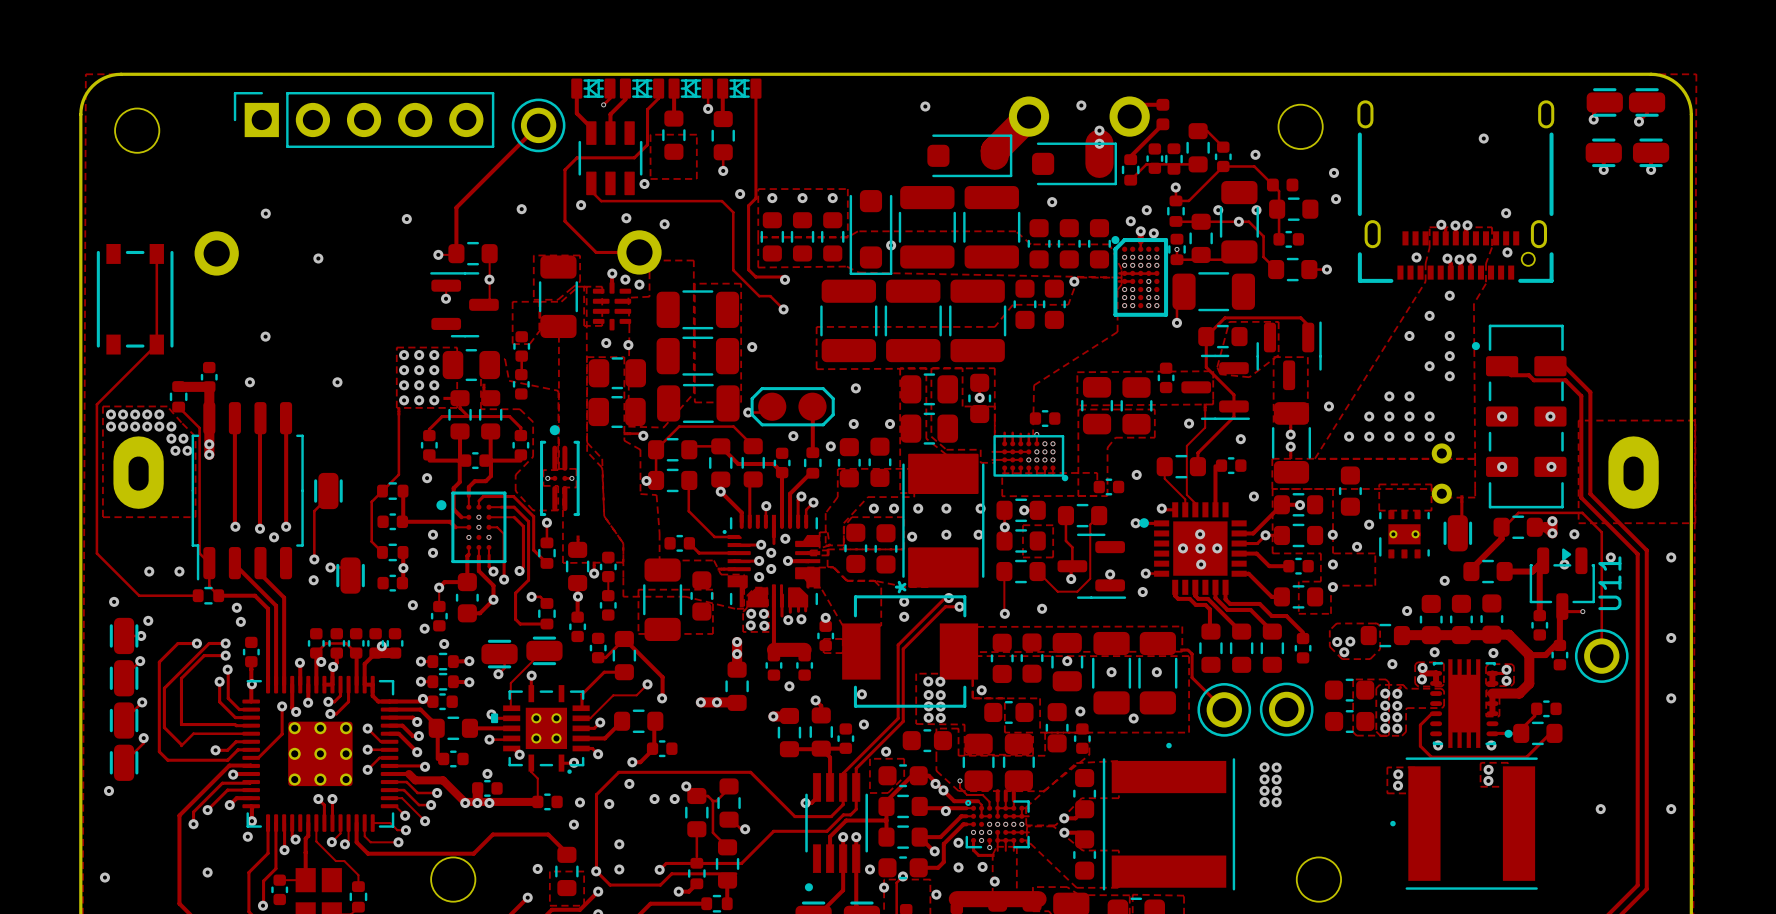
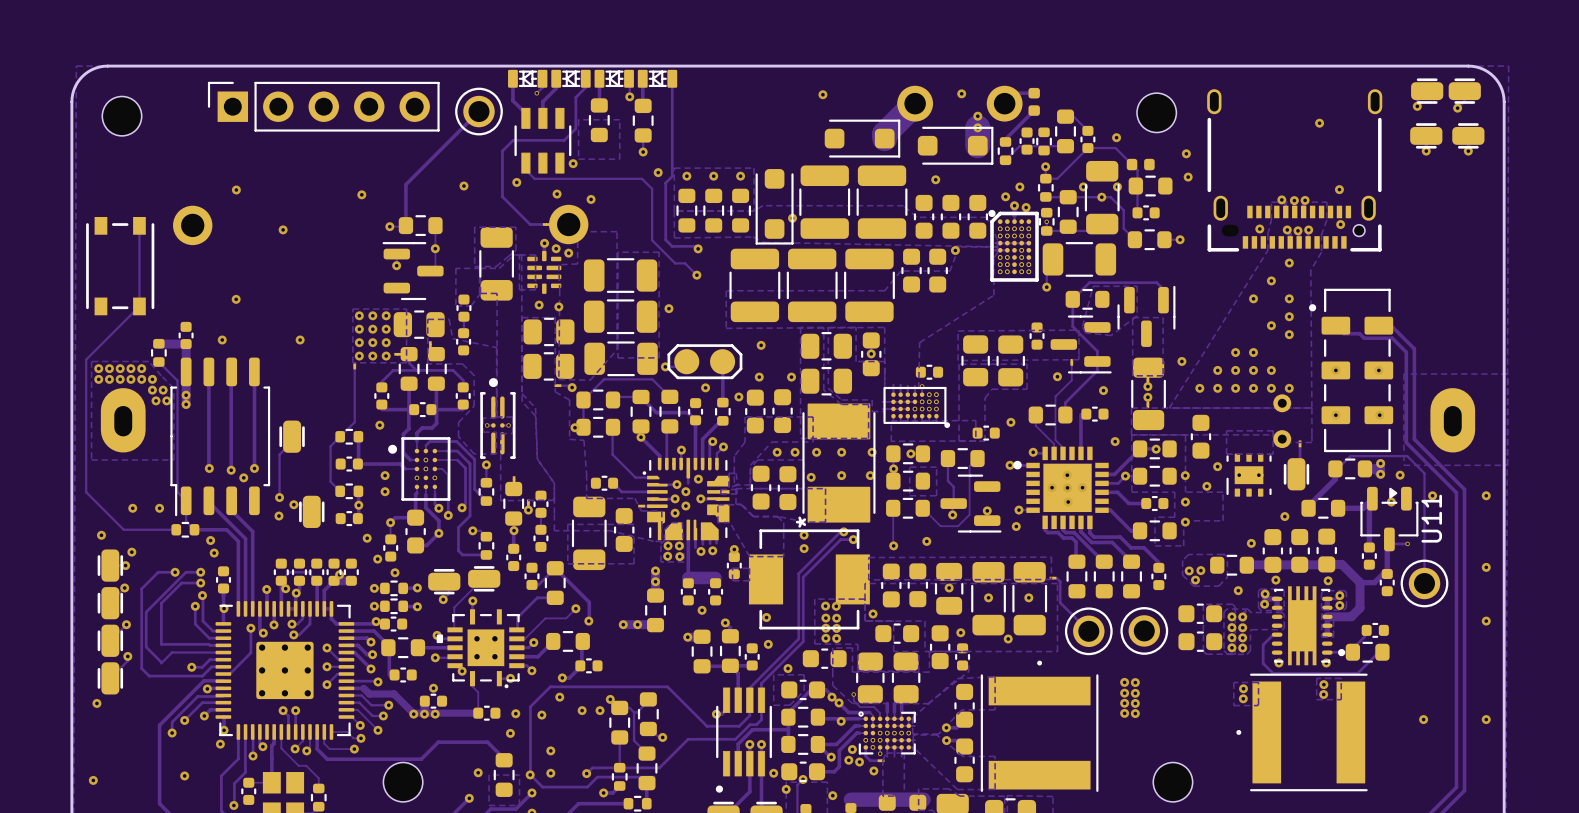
via: none -> (848, 760)
via: none -> (859, 762)
via: (958, 867) -> none
via: (994, 881) -> none

